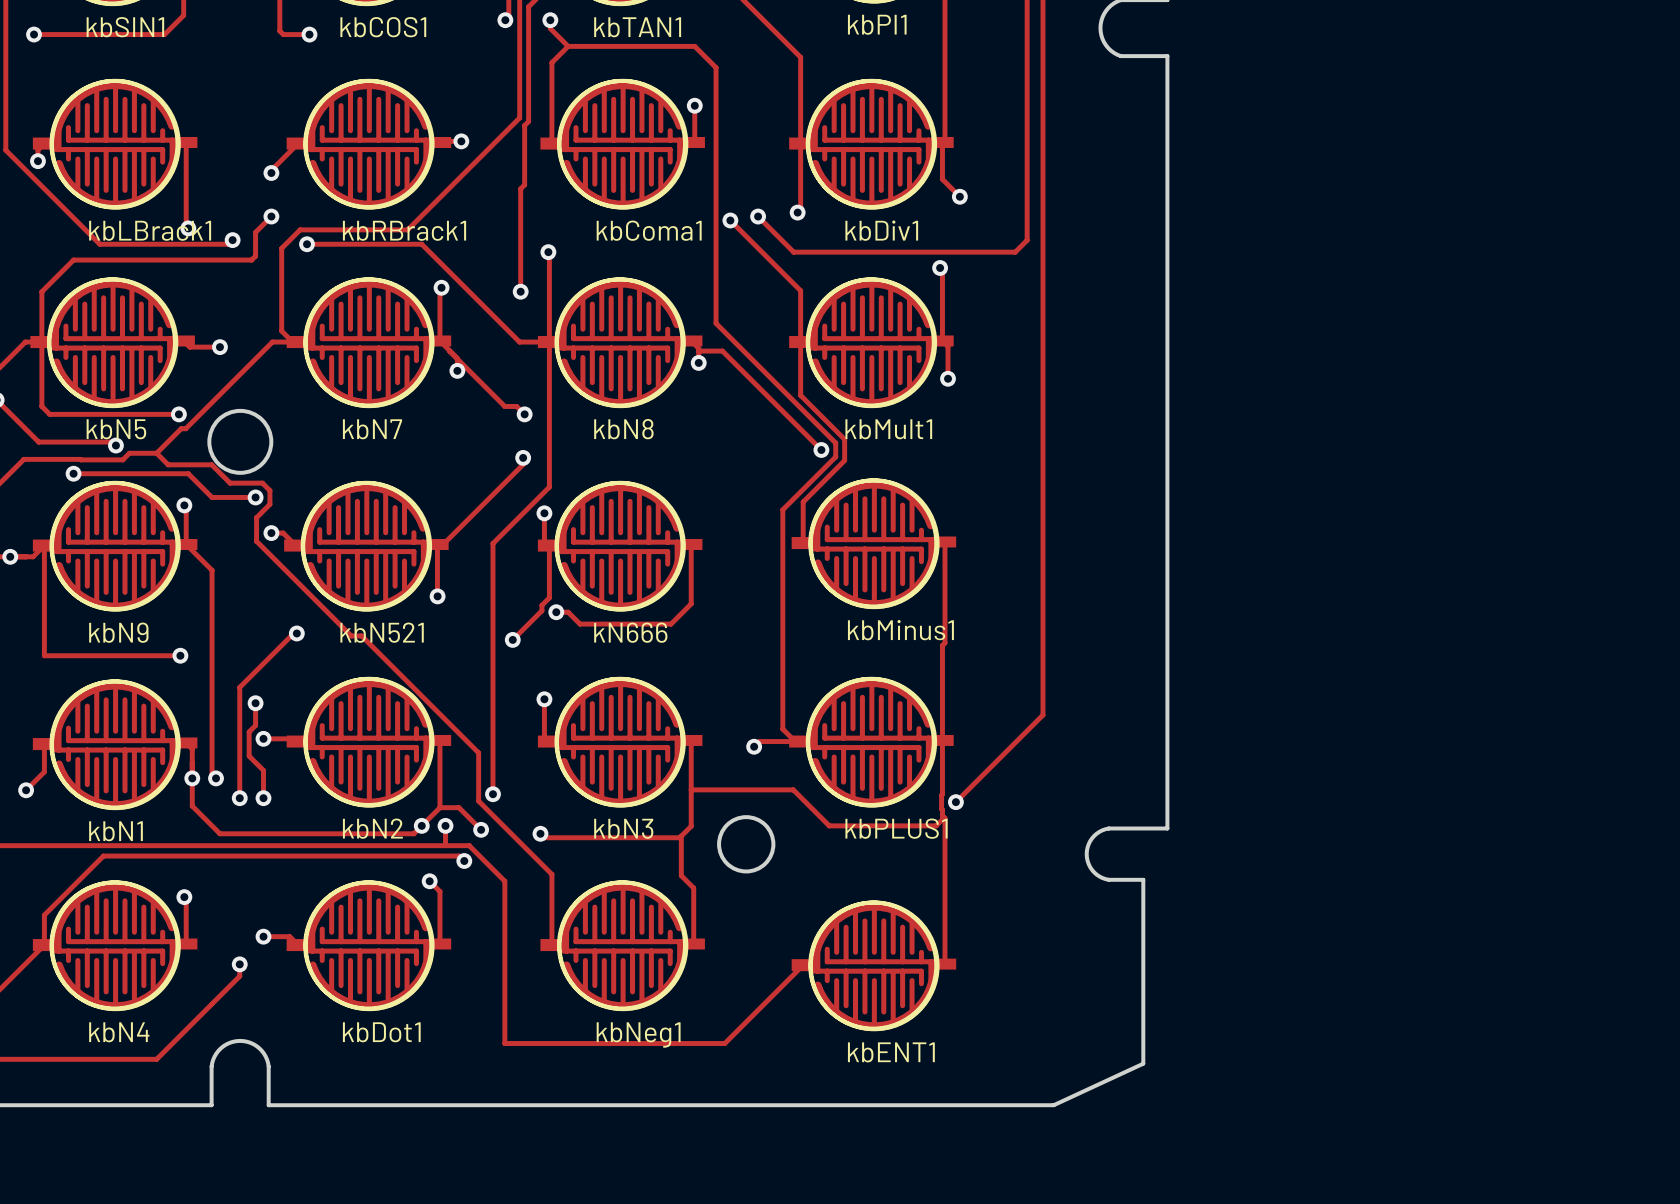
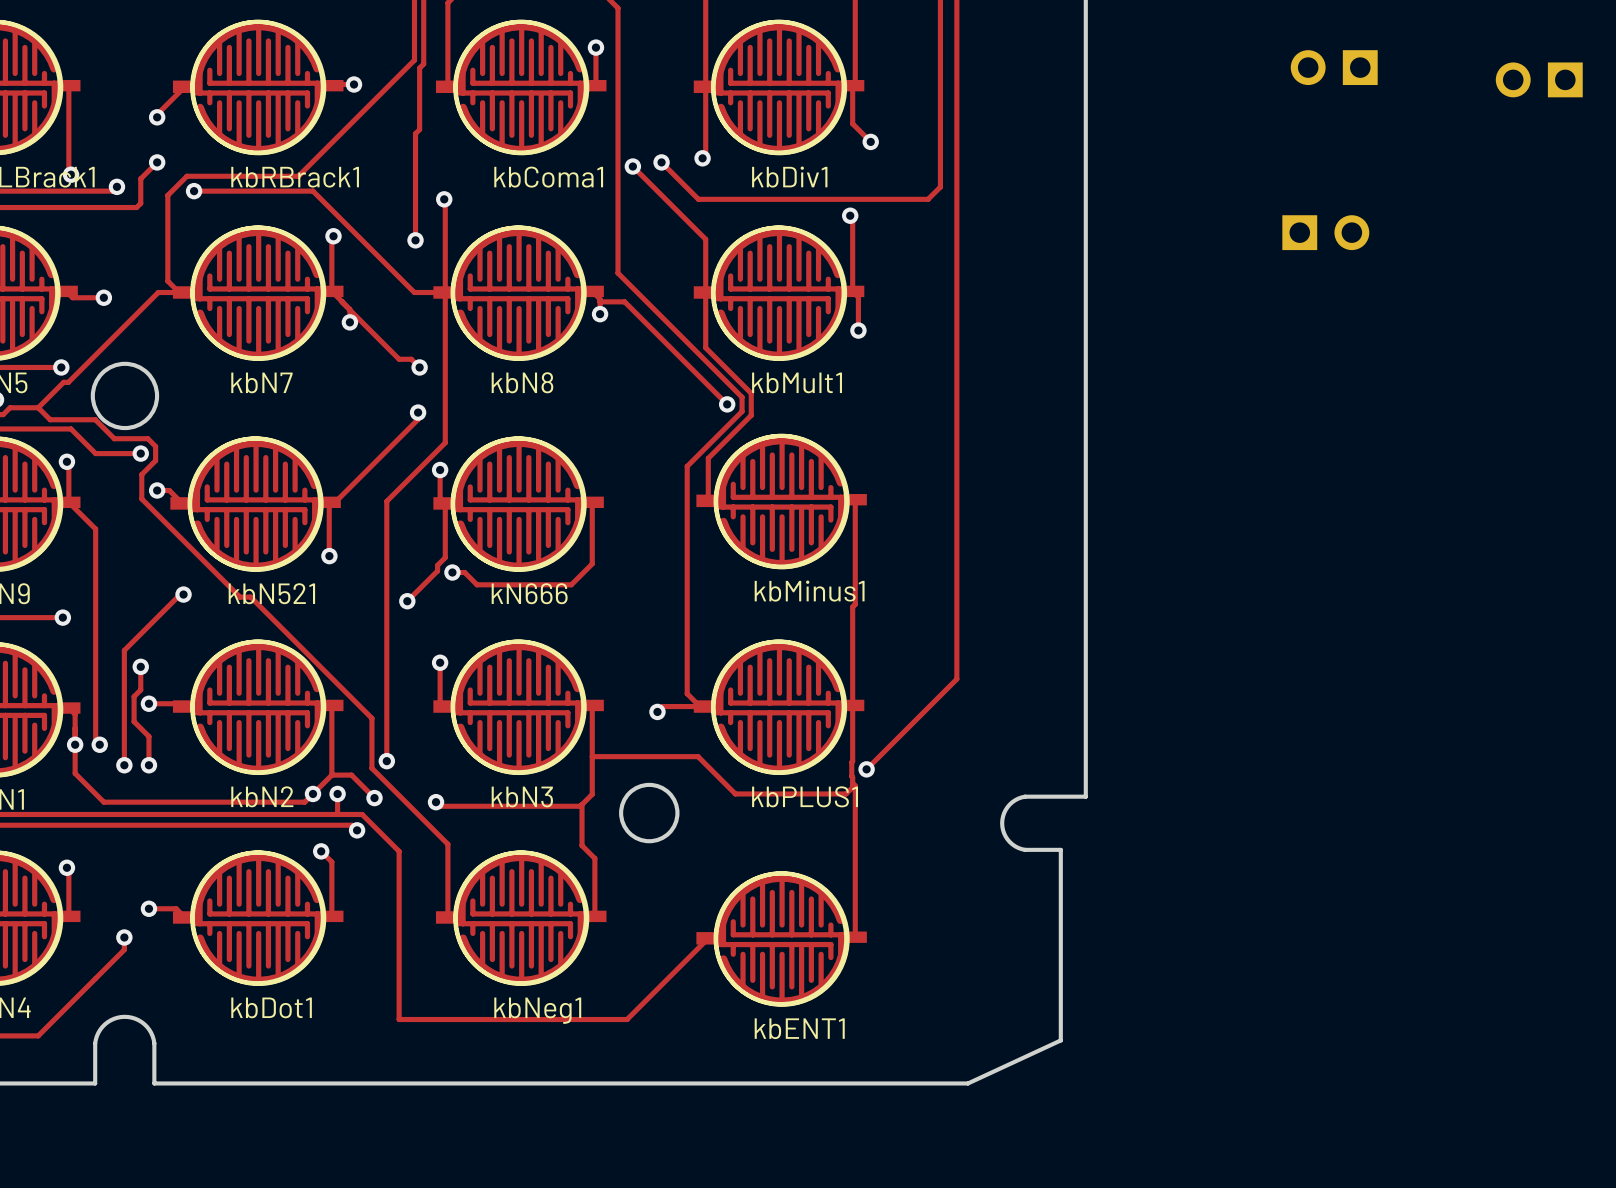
part: none -> (1334, 67)
part: none -> (1539, 79)
part: none -> (1325, 232)

